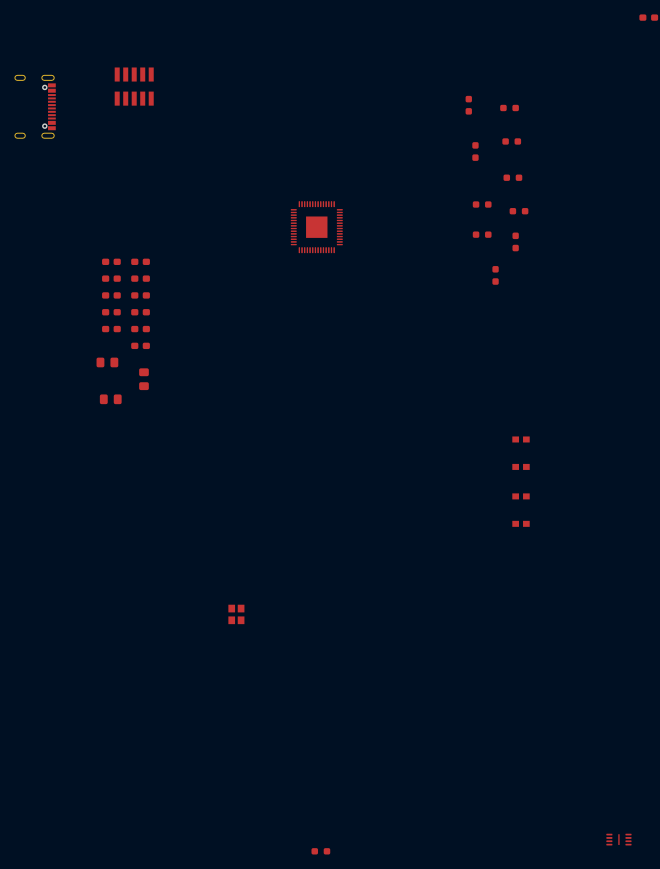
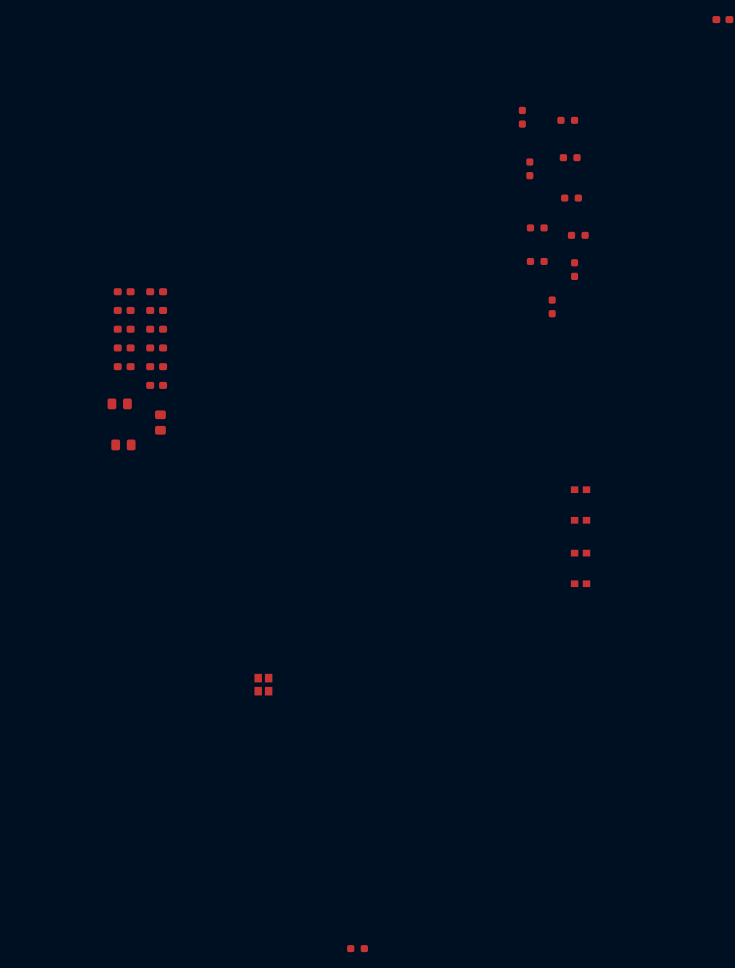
part: (134, 86) -> none
part: (35, 106) -> none
part: (316, 227) -> none
part: (618, 839) -> none

